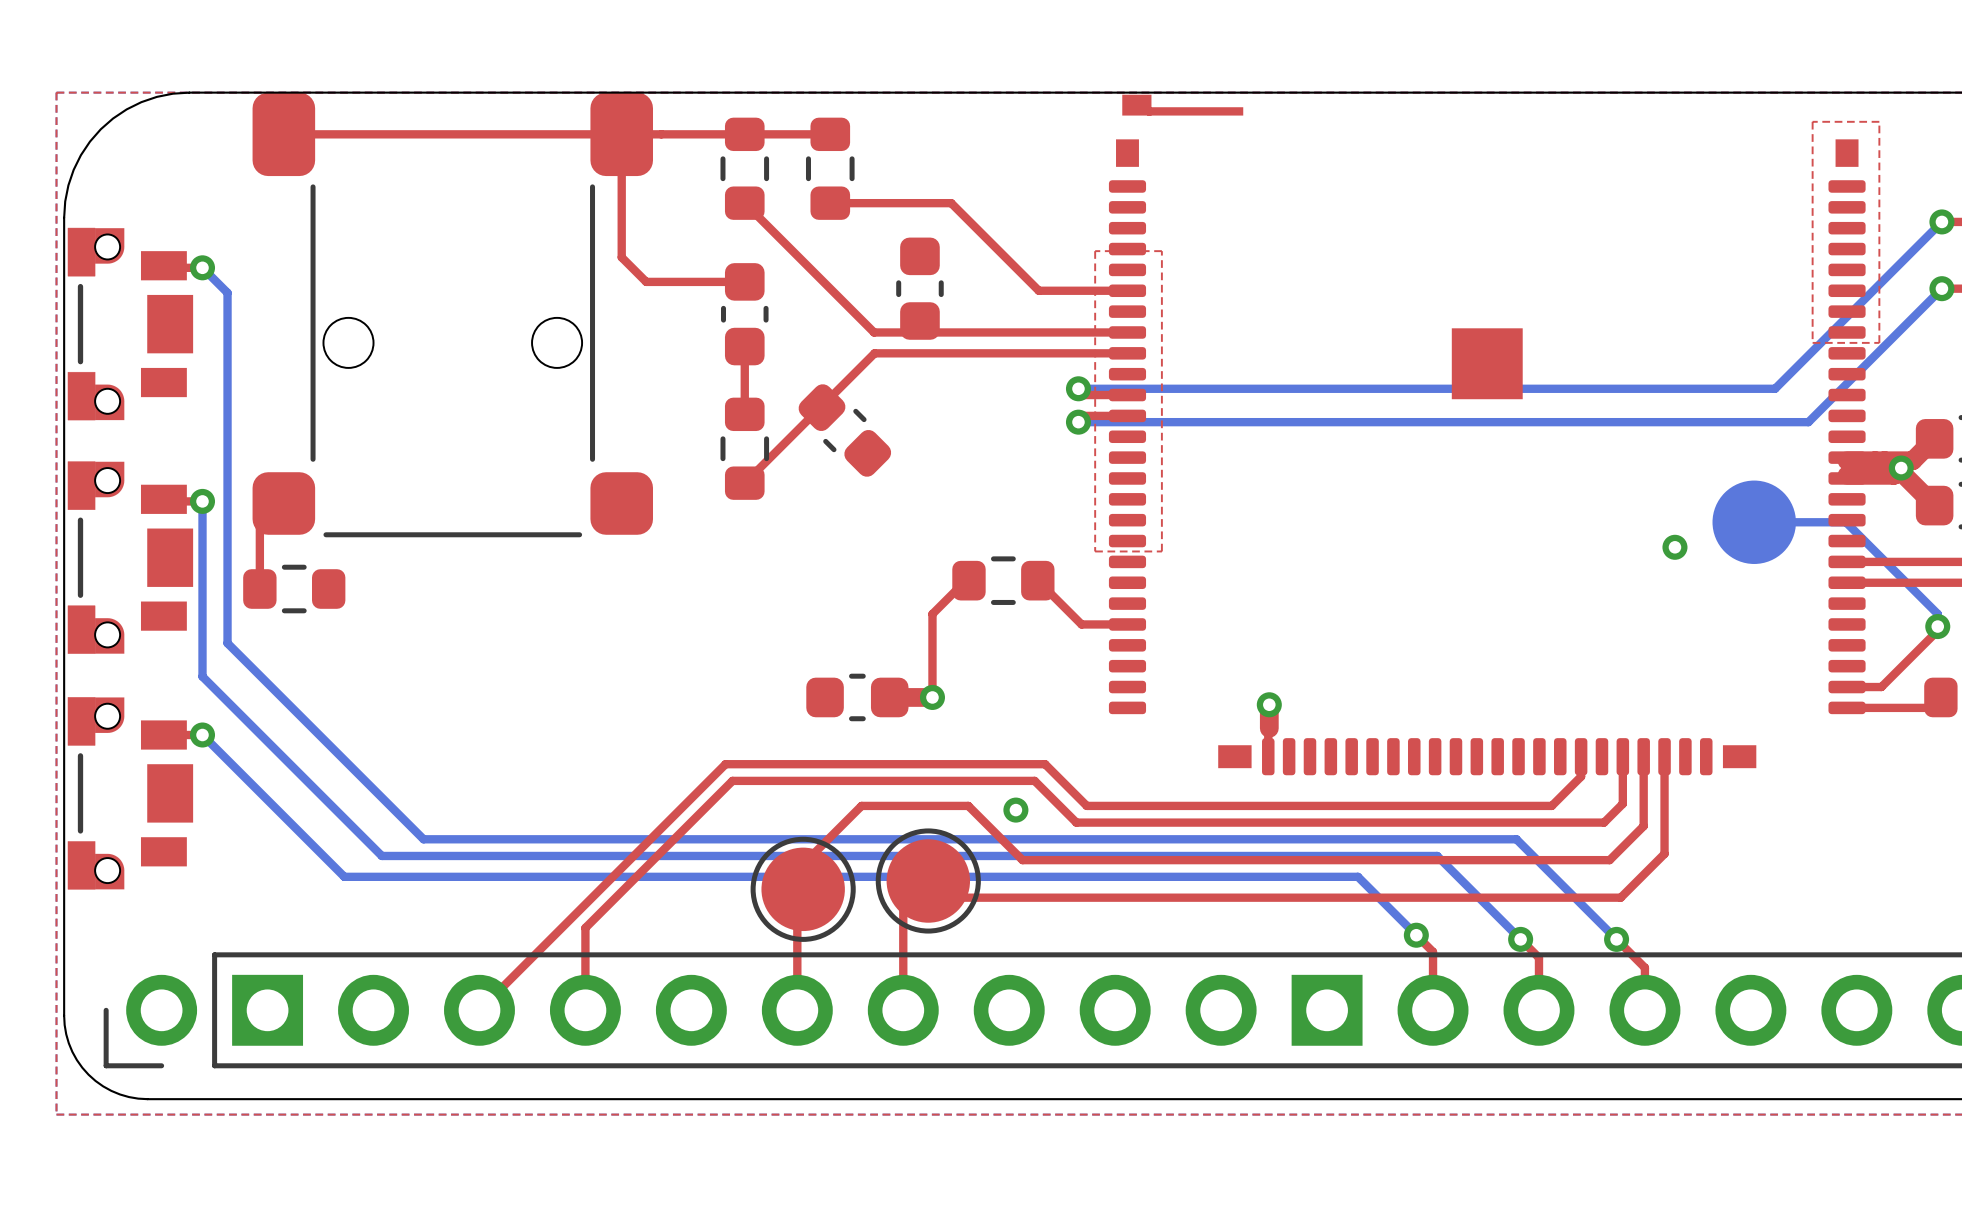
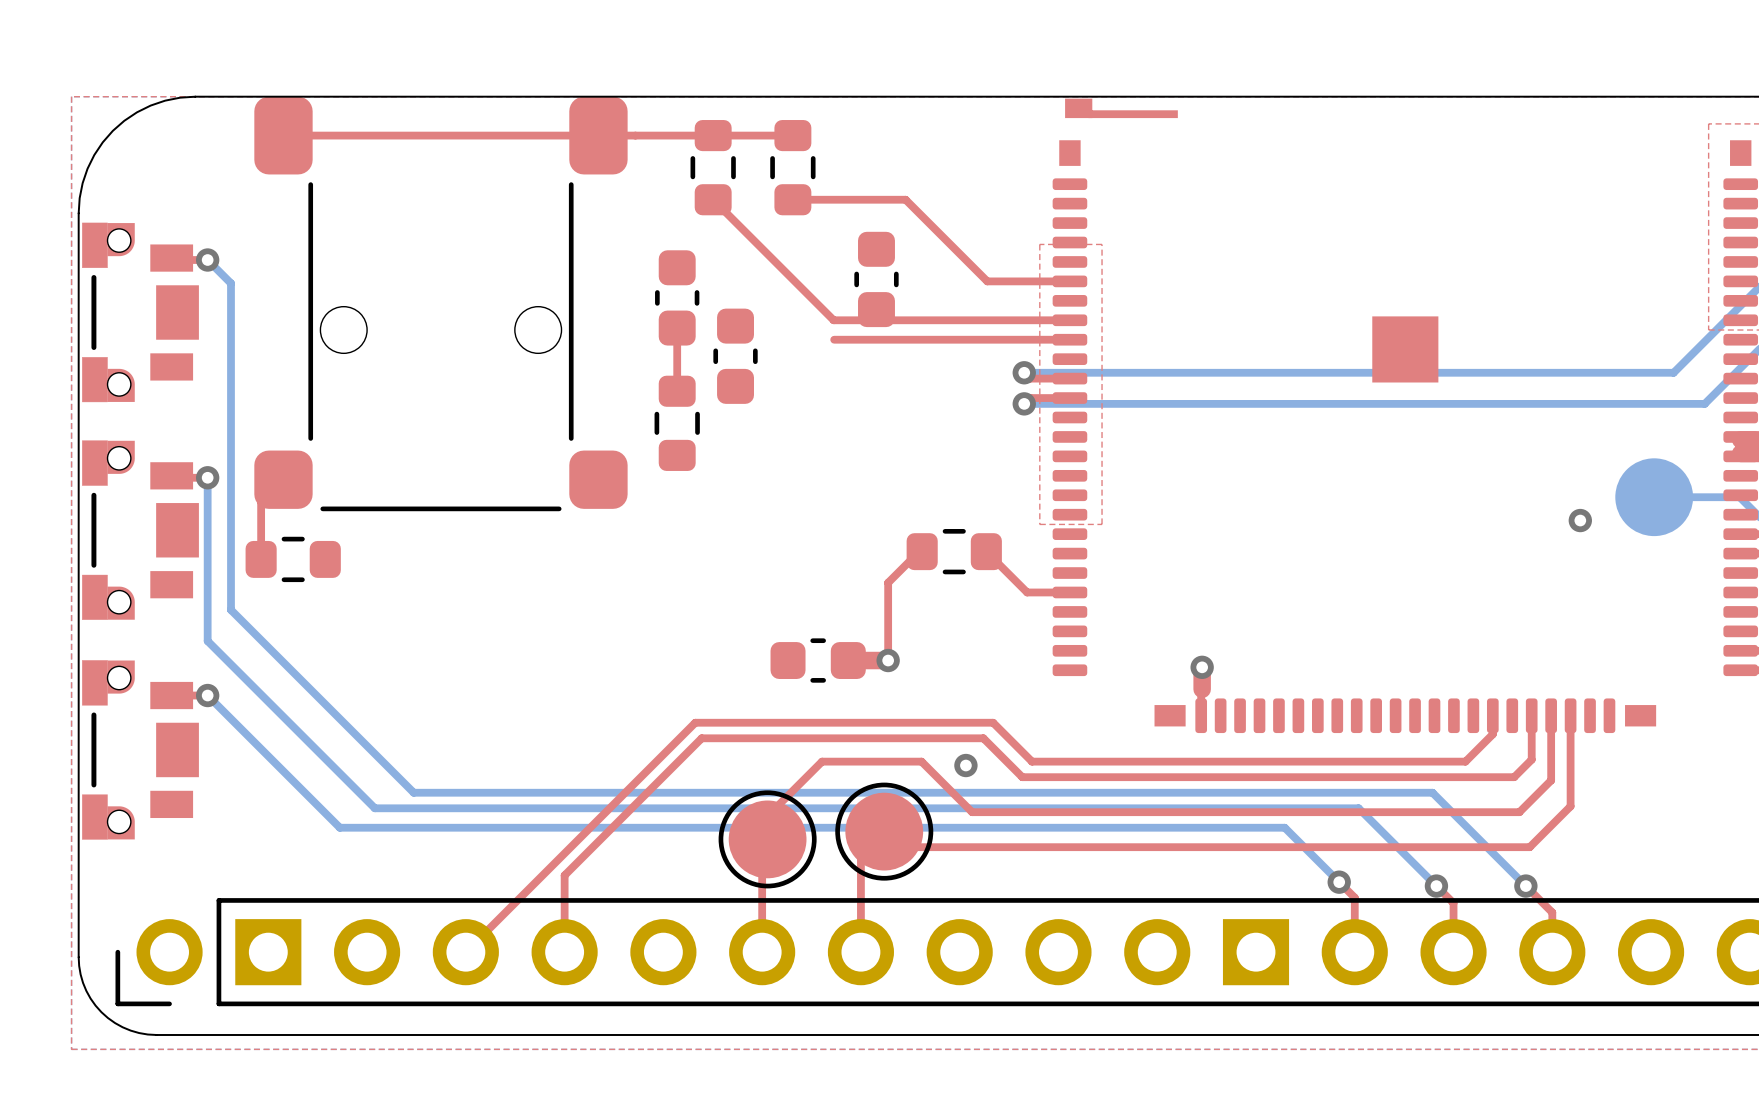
top track: (621, 134) (621, 257) (646, 281) (744, 281) -> none
part: none -> (677, 297)
part: (744, 314) -> none
top track: (744, 346) (744, 414) -> (677, 328) (677, 391)
top track: (874, 353) (744, 483) -> none
part: none -> (735, 356)
part: (844, 430) -> none
part position: (744, 448) -> (677, 423)

